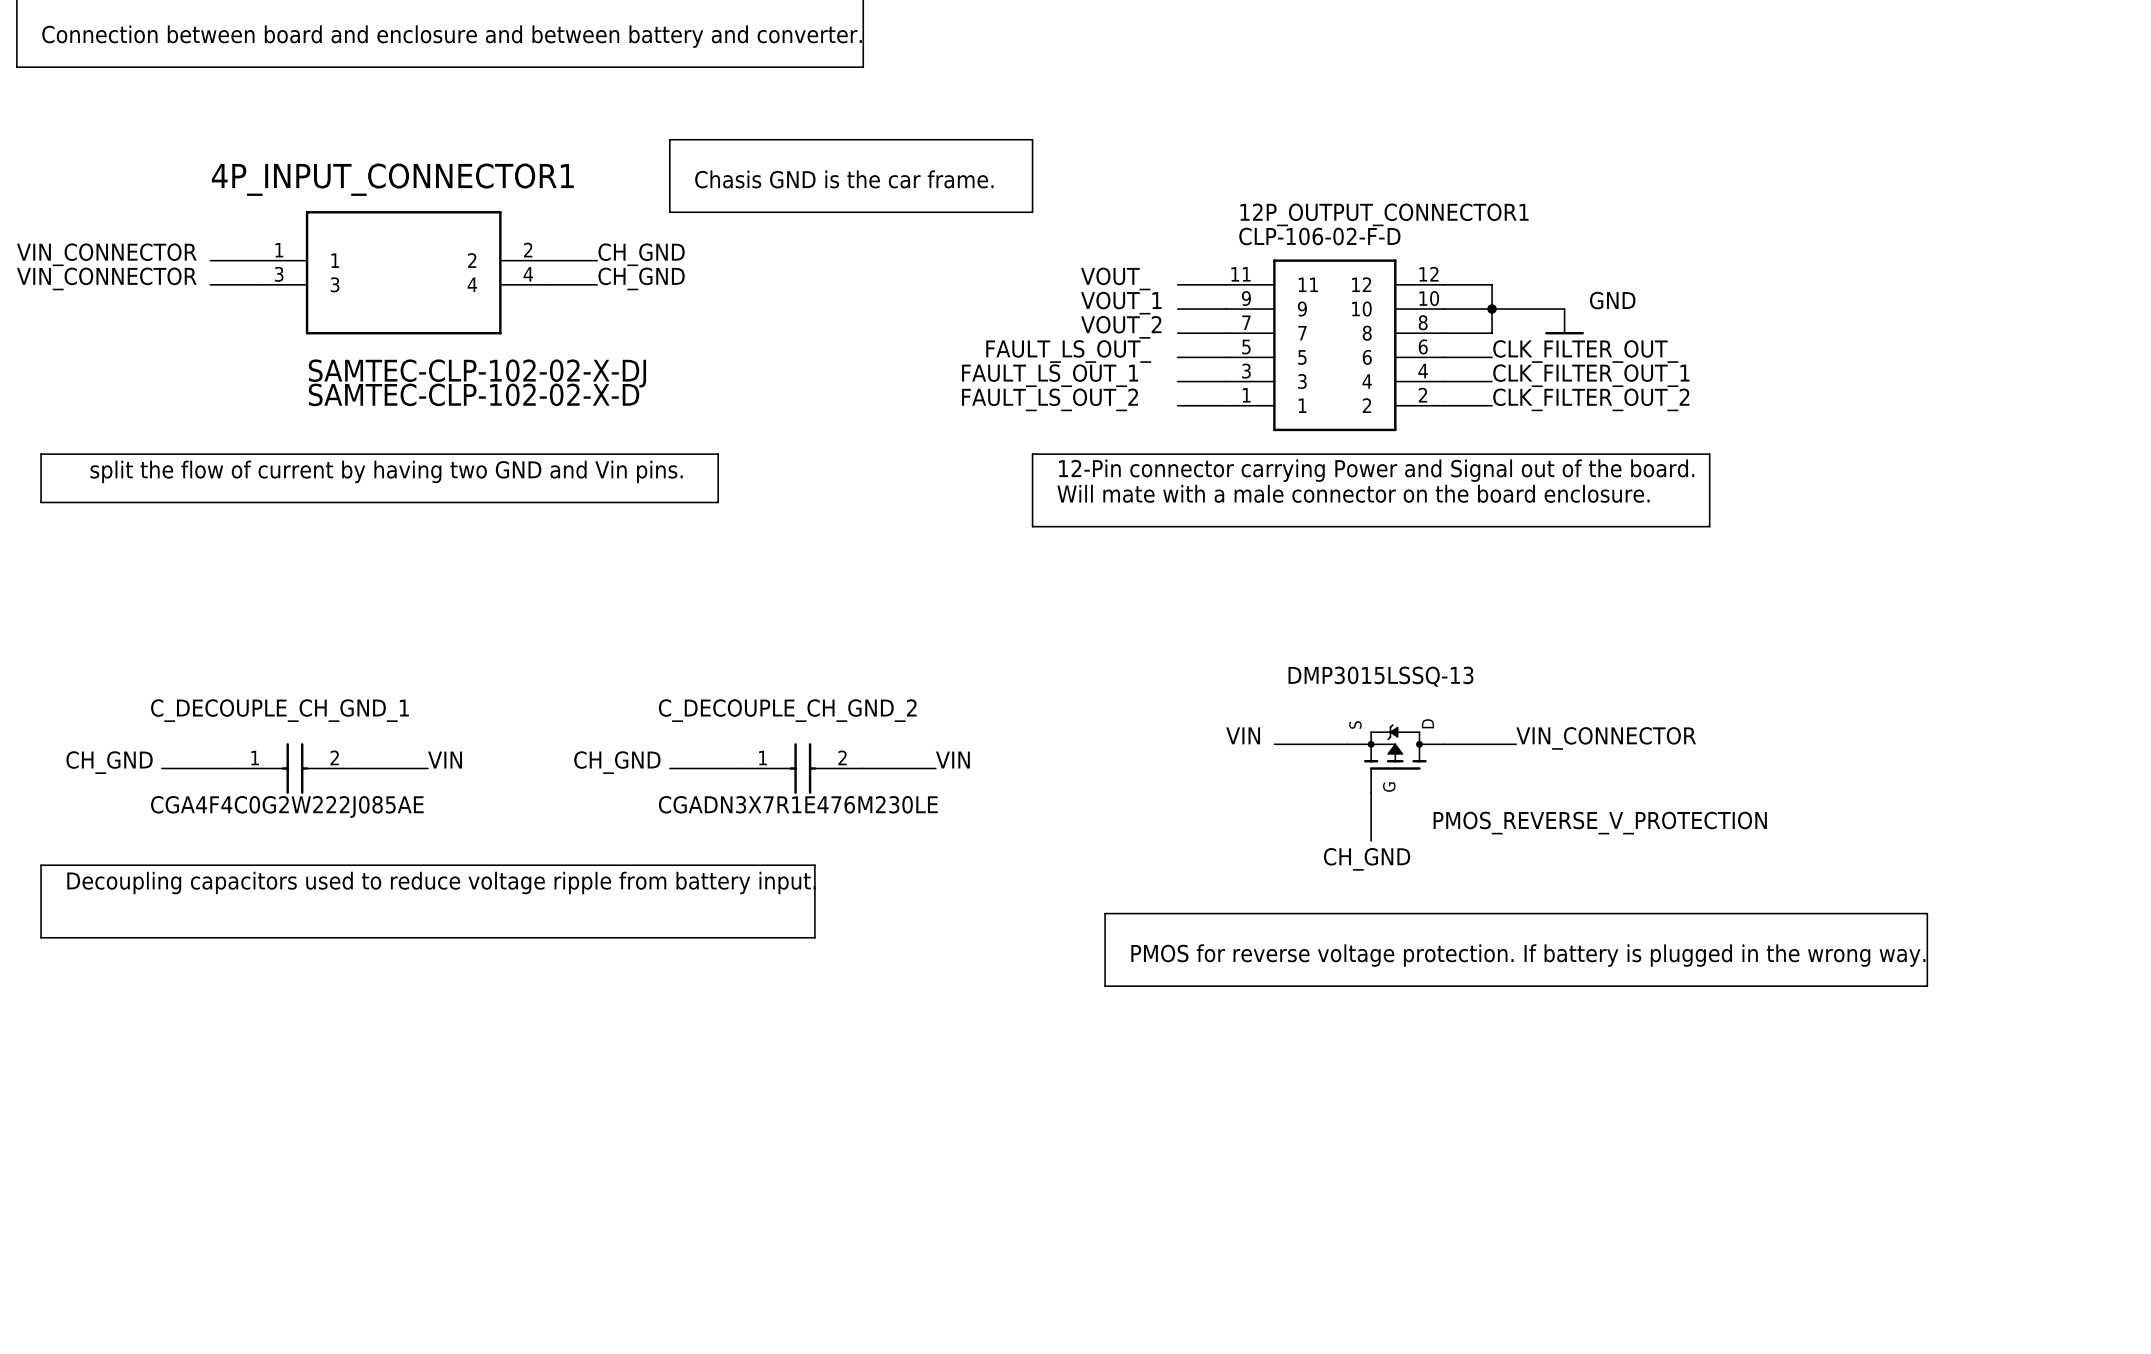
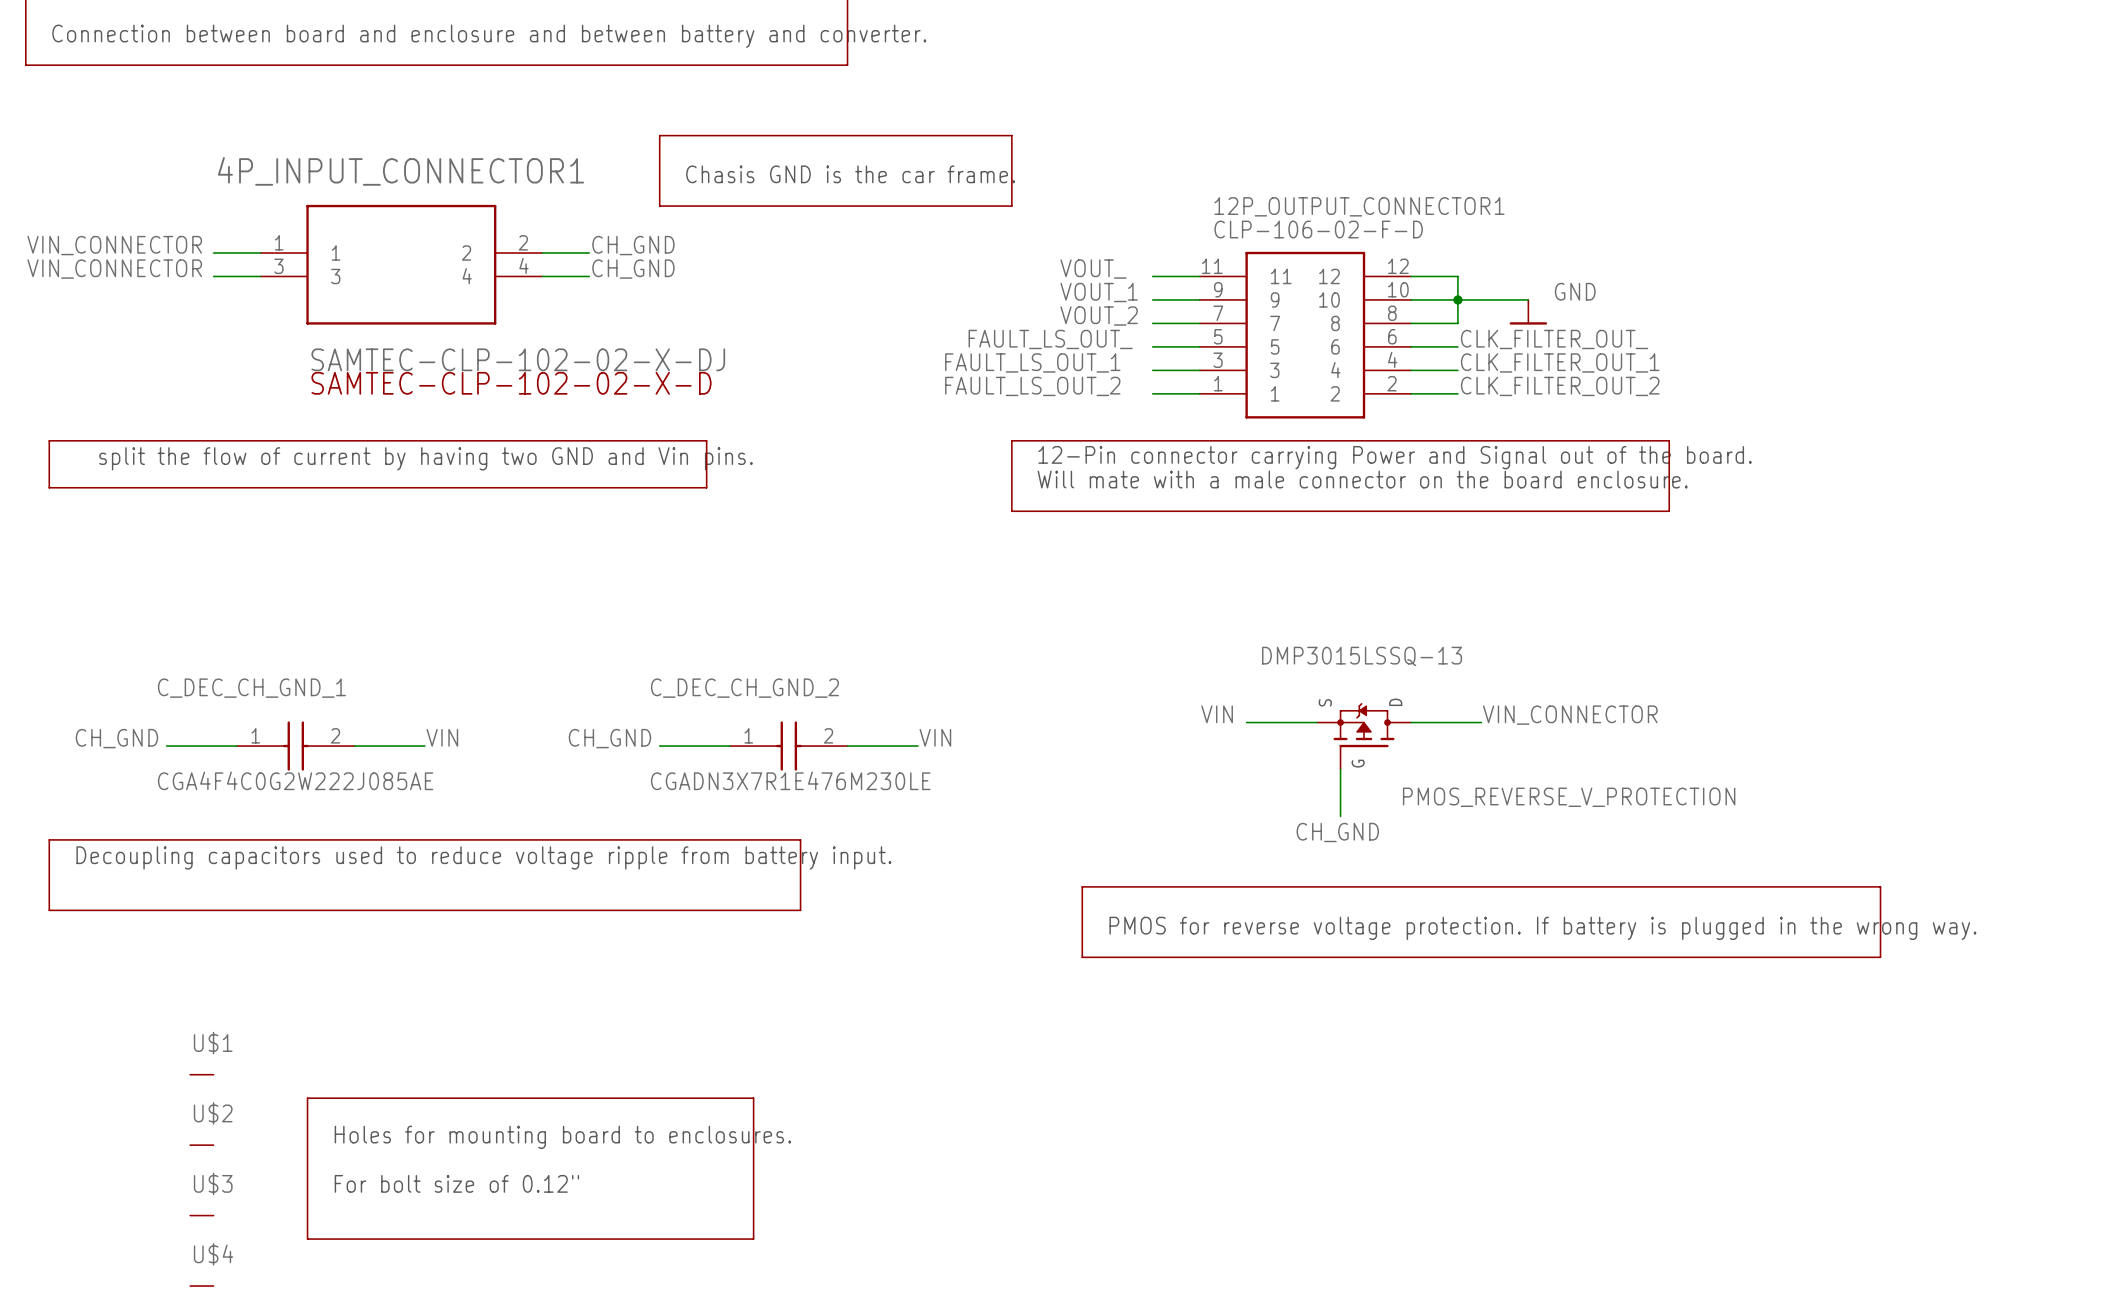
C_DECOUPLE_CH_GND_1 name: C_DECOUPLE_CH_GND_1 (279, 710) -> C_DEC_CH_GND_1 (251, 688)
C_DECOUPLE_CH_GND_2 name: C_DECOUPLE_CH_GND_2 (787, 710) -> C_DEC_CH_GND_2 (744, 688)
U$1: none -> (201, 1074)
line: none -> (307, 1098) (307, 1239) (753, 1239) (753, 1098) (307, 1098)
text: none -> Holes for mounting board to enclosures. (562, 1137)
U$2: none -> (201, 1145)
text: none -> For bolt size of 0.12" (456, 1183)
U$3: none -> (201, 1215)
U$4: none -> (201, 1286)

